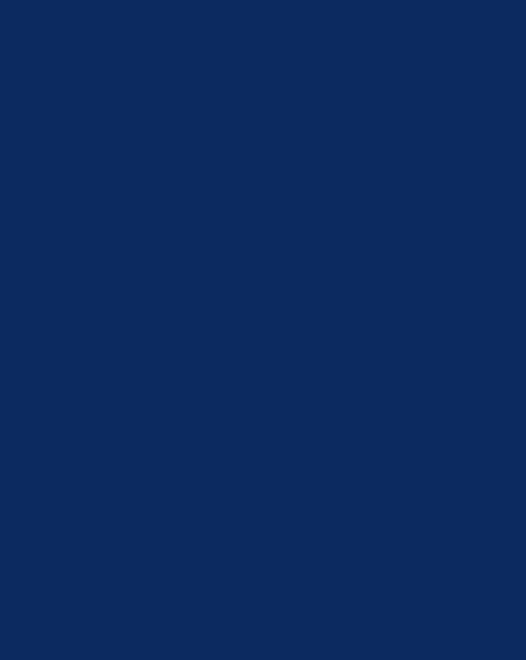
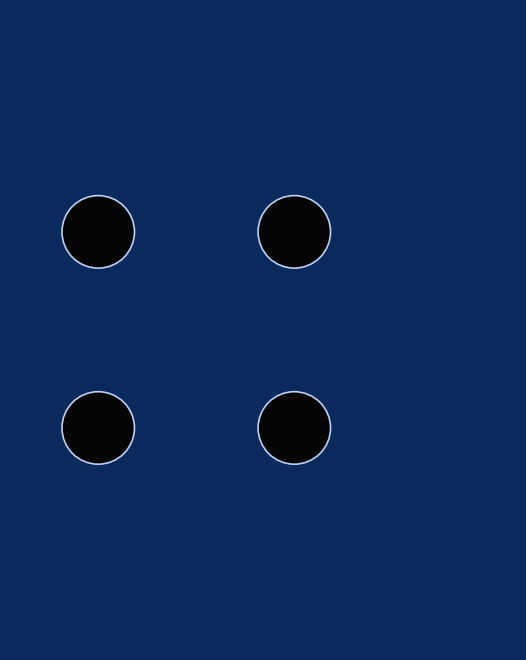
part: none -> (98, 231)
part: none -> (294, 231)
part: none -> (98, 427)
part: none -> (294, 427)

